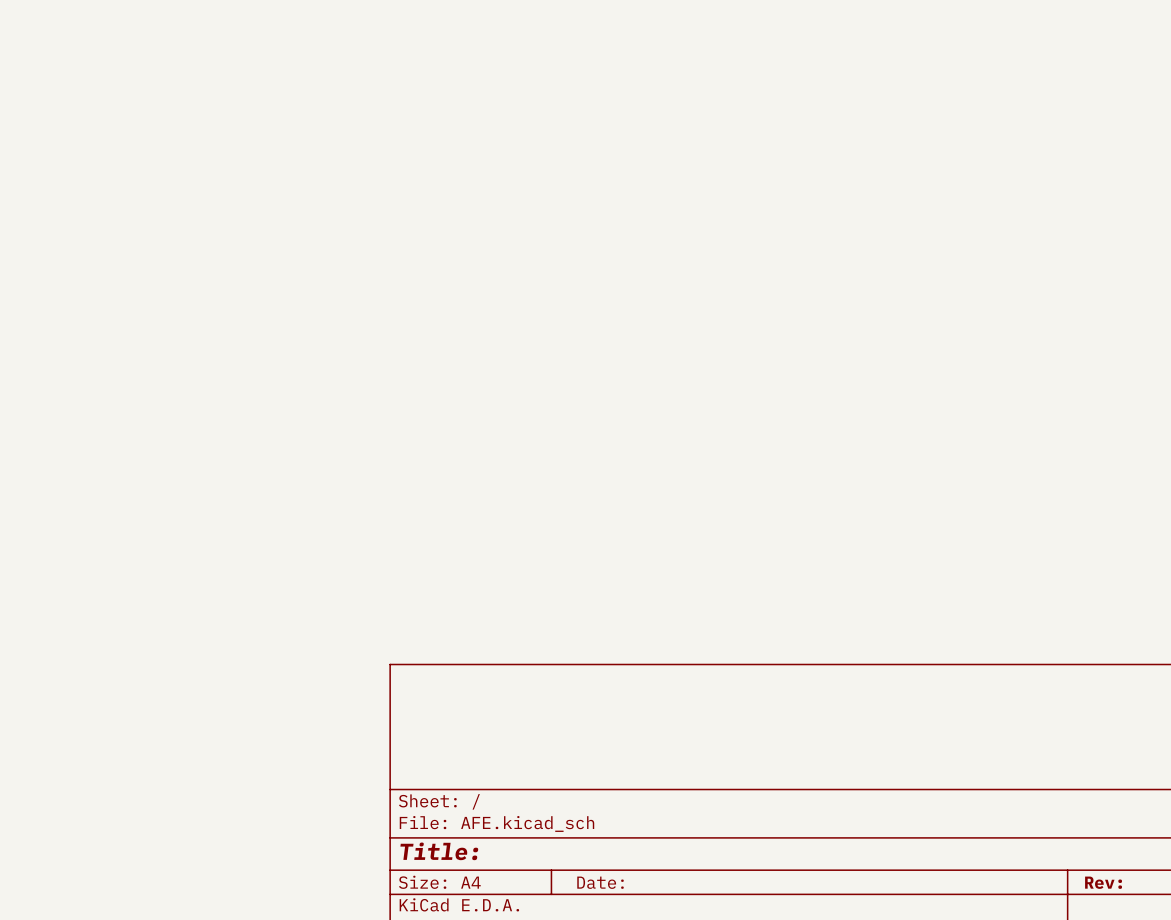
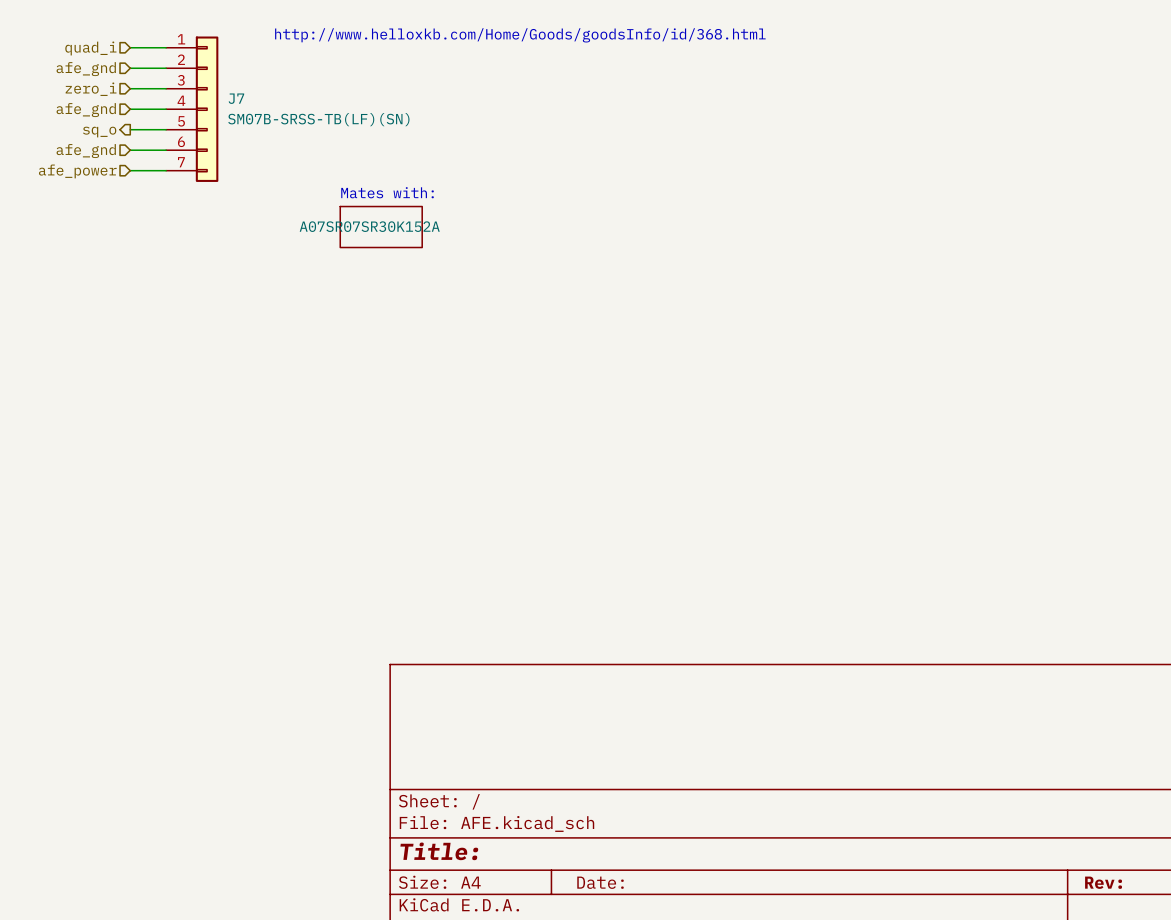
text: none -> http://www.helloxkb.com/Home/Goods/goodsInfo/id/368.html (520, 35)
wire: none -> (130, 47) (166, 47)
hierarchical label: none -> quad_i (90, 48)
wire: none -> (130, 68) (166, 68)
hierarchical label: none -> afe_gnd (86, 69)
wire: none -> (130, 88) (166, 88)
hierarchical label: none -> zero_i (91, 89)
wire: none -> (130, 109) (166, 109)
J7: none -> SM07B-SRSS-TB(LF)(SN) (192, 109)
hierarchical label: none -> afe_gnd (86, 110)
wire: none -> (130, 129) (166, 129)
hierarchical label: none -> sq_o (99, 132)
wire: none -> (130, 150) (166, 150)
hierarchical label: none -> afe_gnd (86, 151)
wire: none -> (130, 170) (166, 170)
hierarchical label: none -> afe_power (77, 171)
text: none -> Mates with: (387, 192)
part: none -> A07SR07SR30K152A (381, 227)

